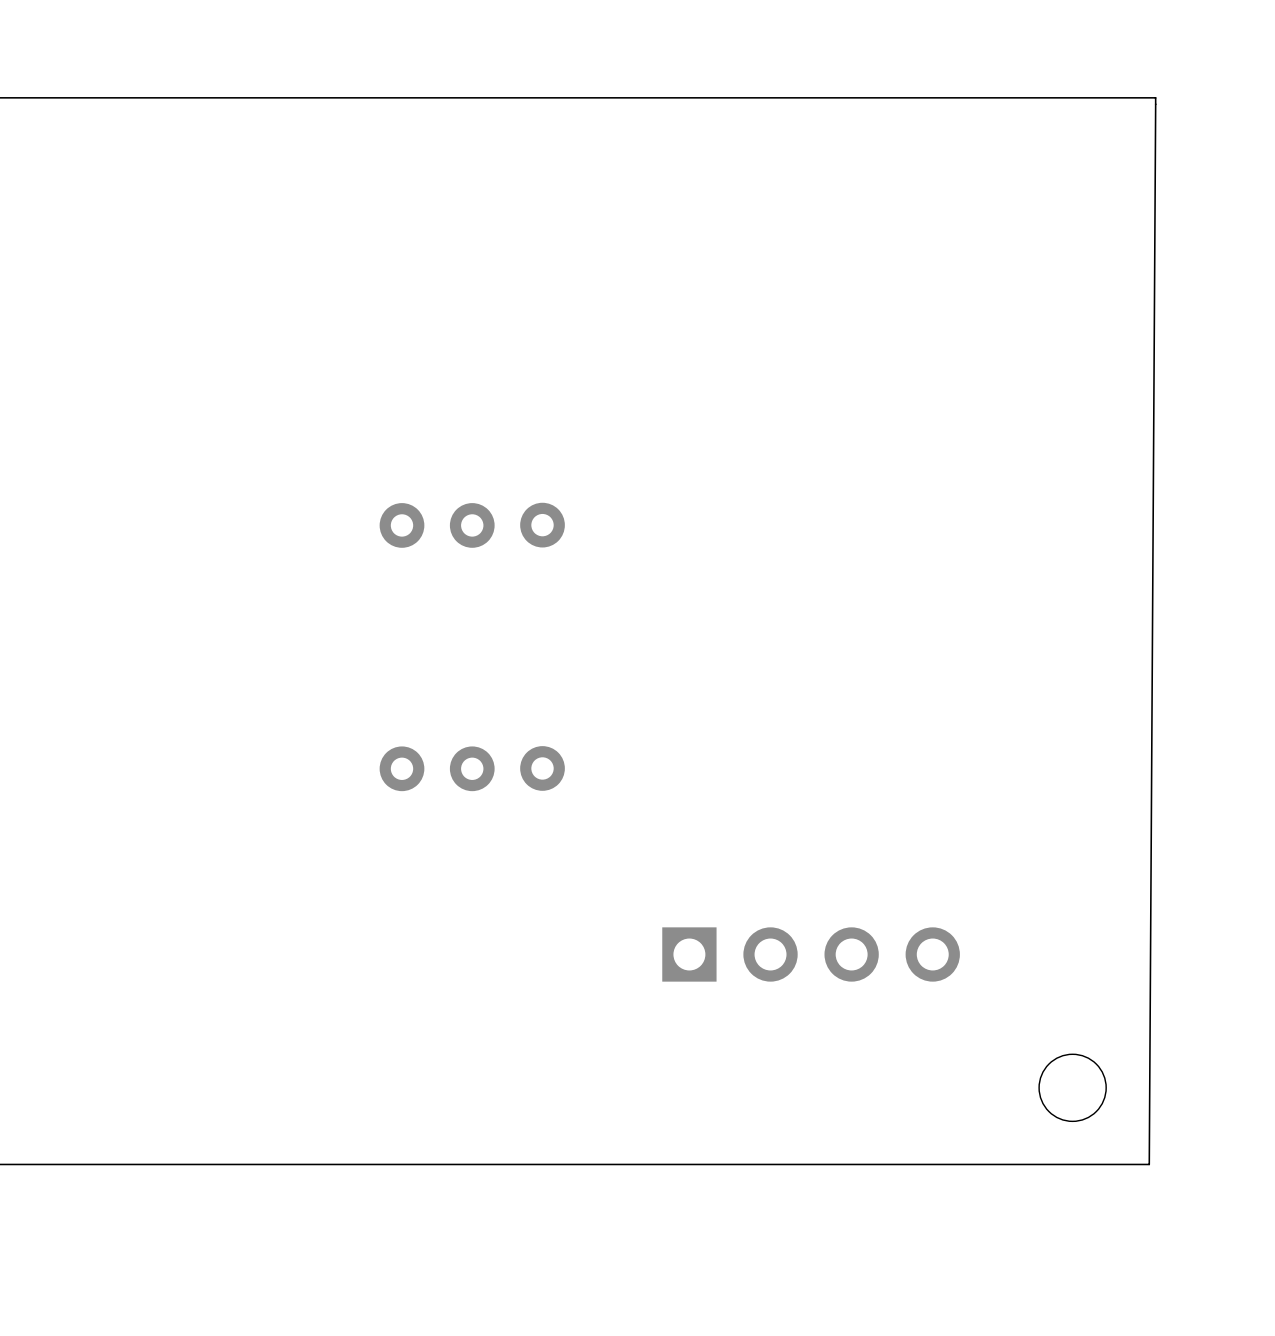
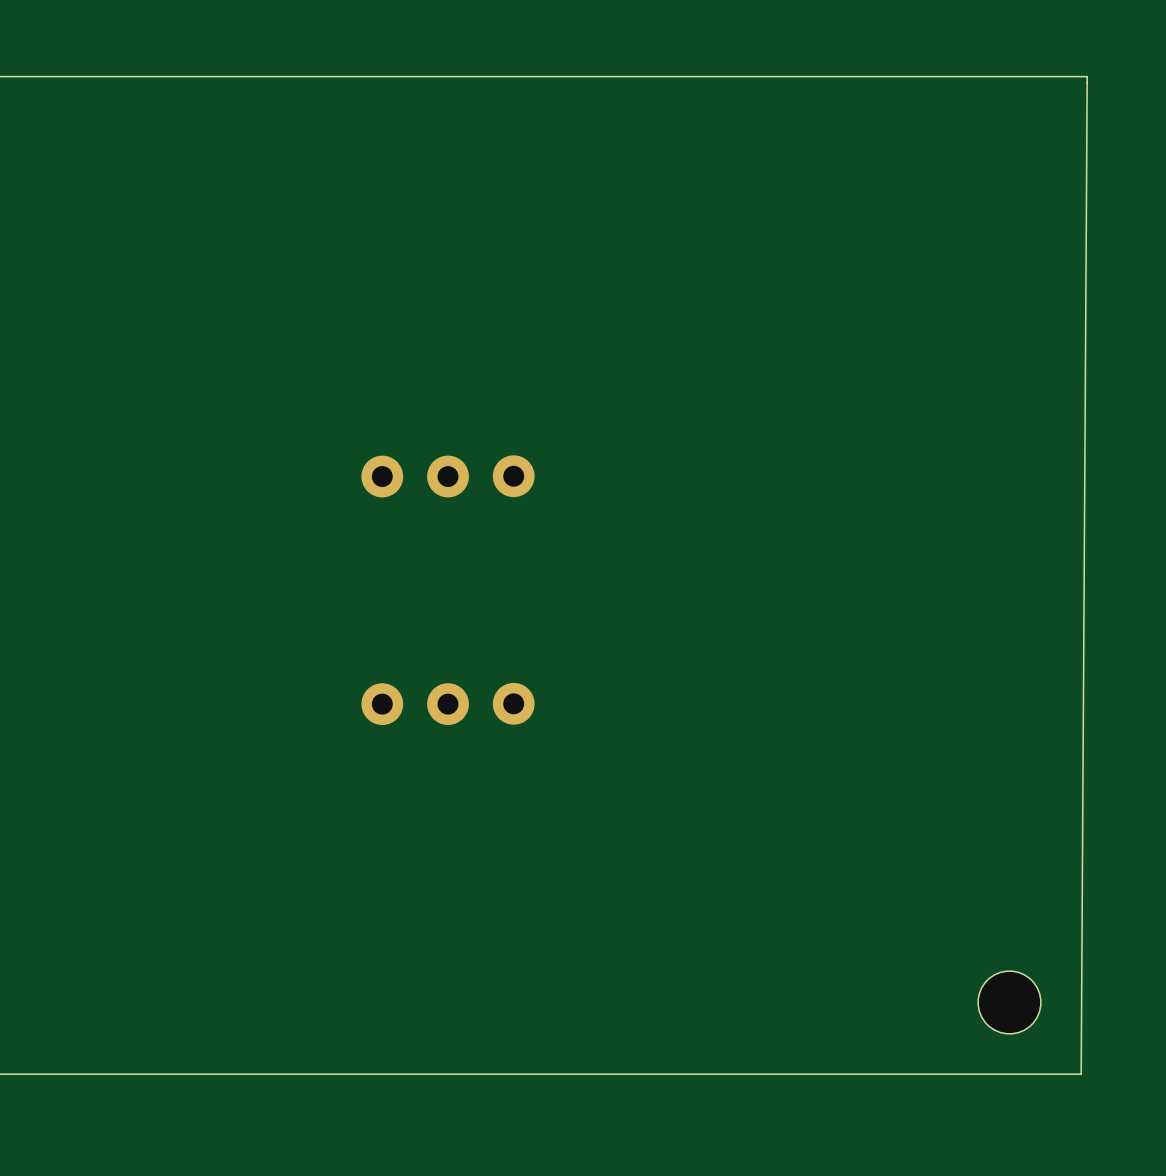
part: (811, 954) -> none

